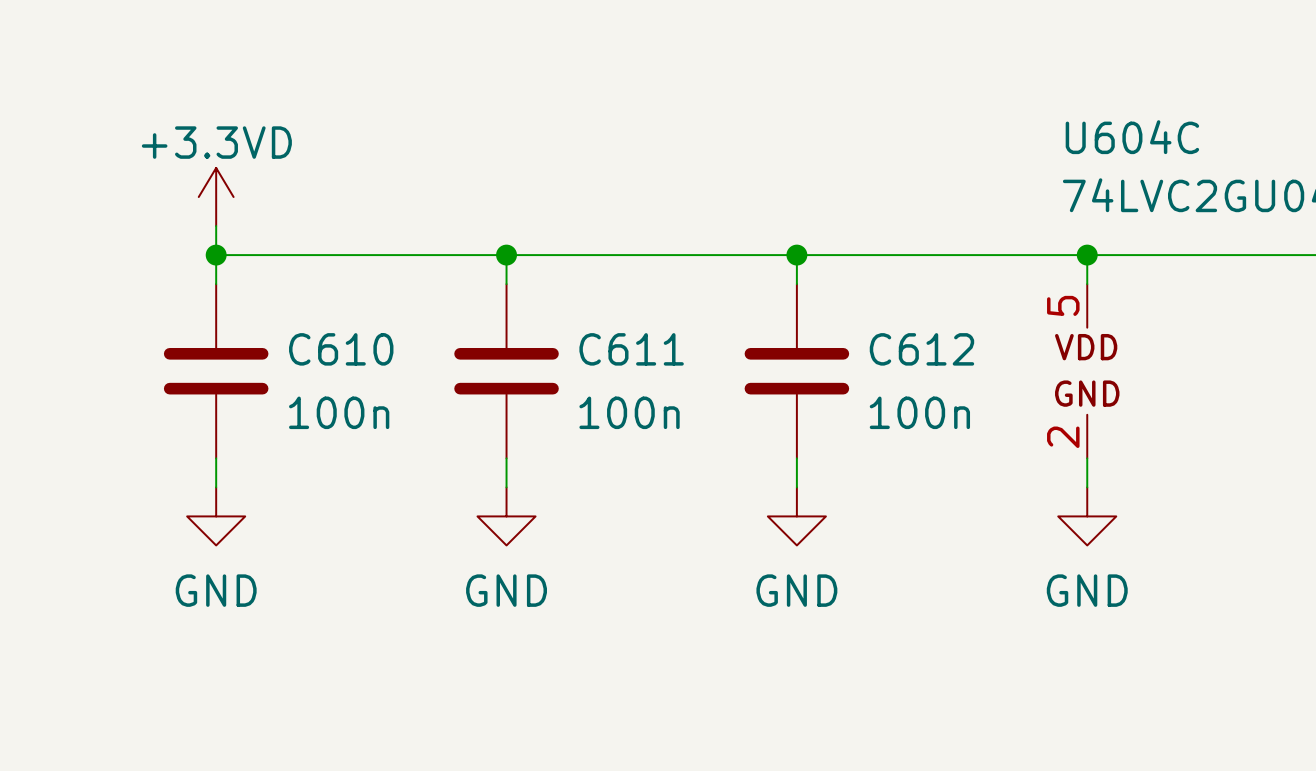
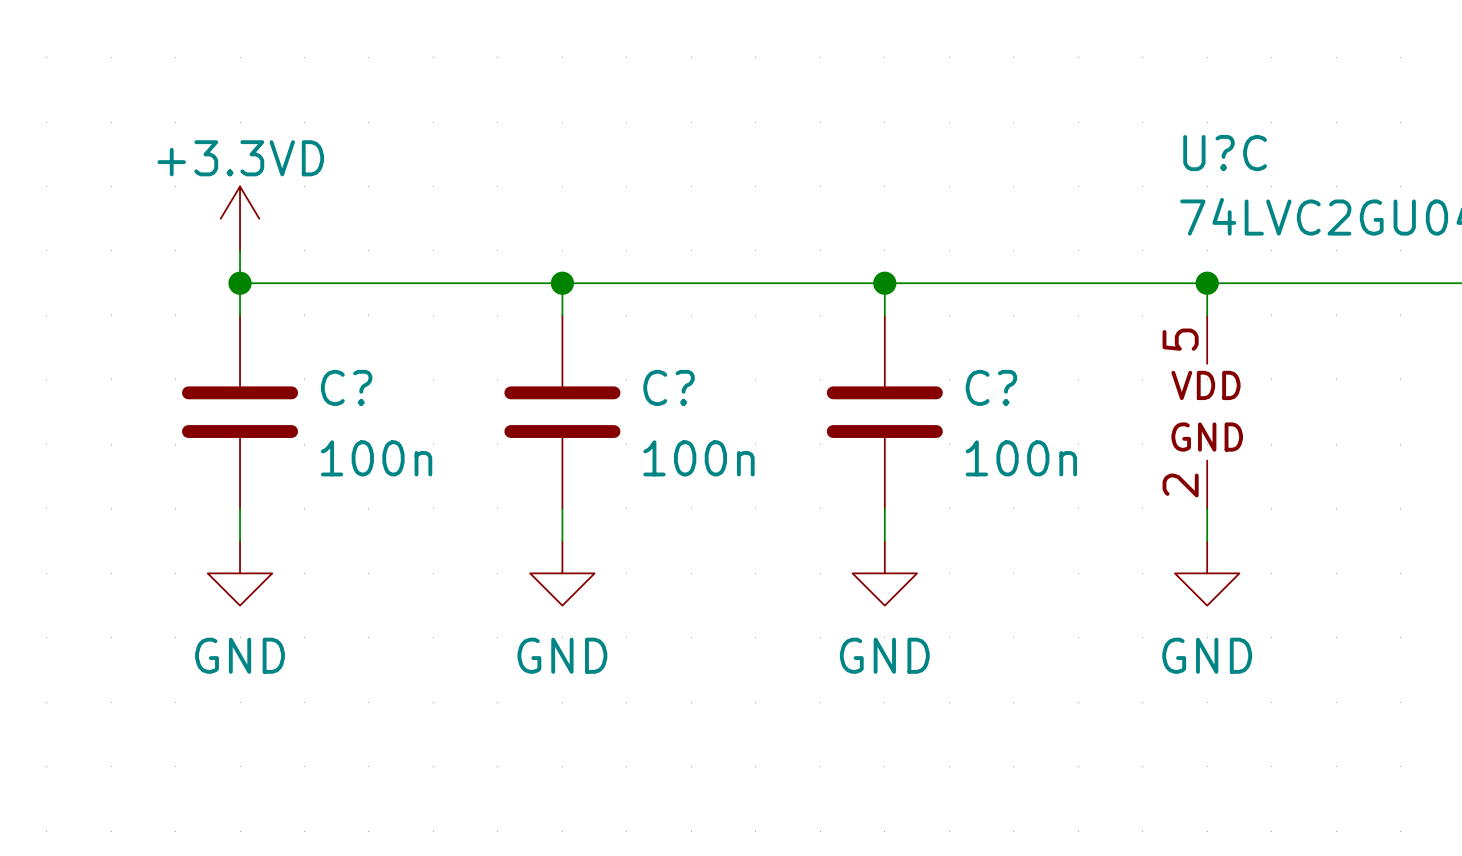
U604C name: U604C (1132, 137) -> U?C (1225, 153)
C610 name: C610 (341, 349) -> C? (346, 387)
C611 name: C611 (631, 349) -> C? (669, 387)
C612 name: C612 (921, 349) -> C? (991, 387)

